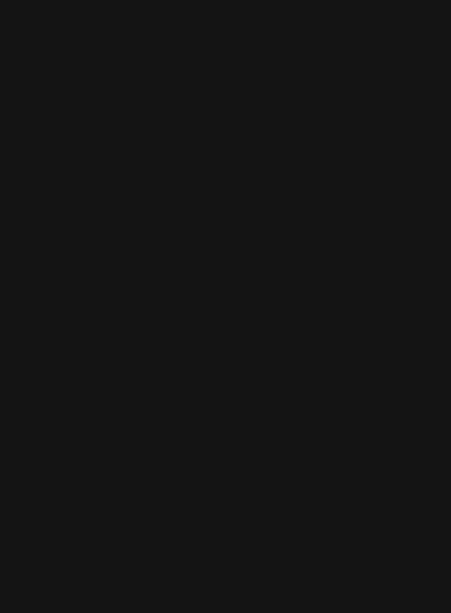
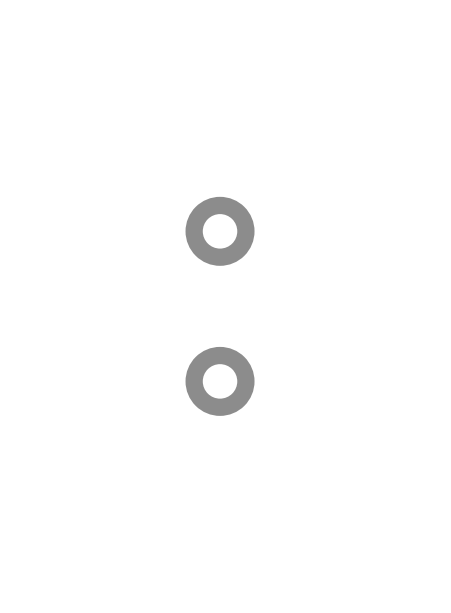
part: none -> (220, 231)
part: none -> (220, 381)

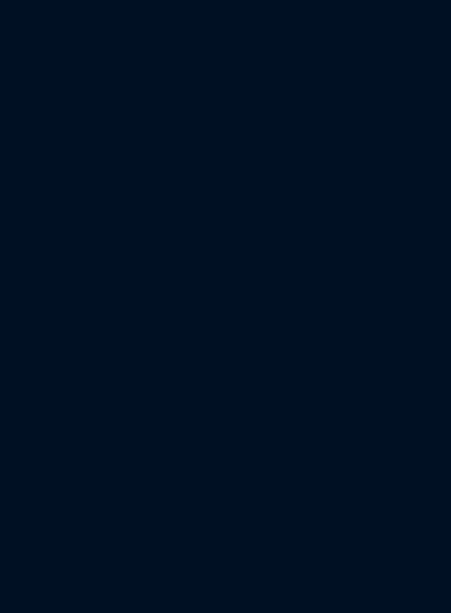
part: (220, 231) -> none
part: (220, 381) -> none

